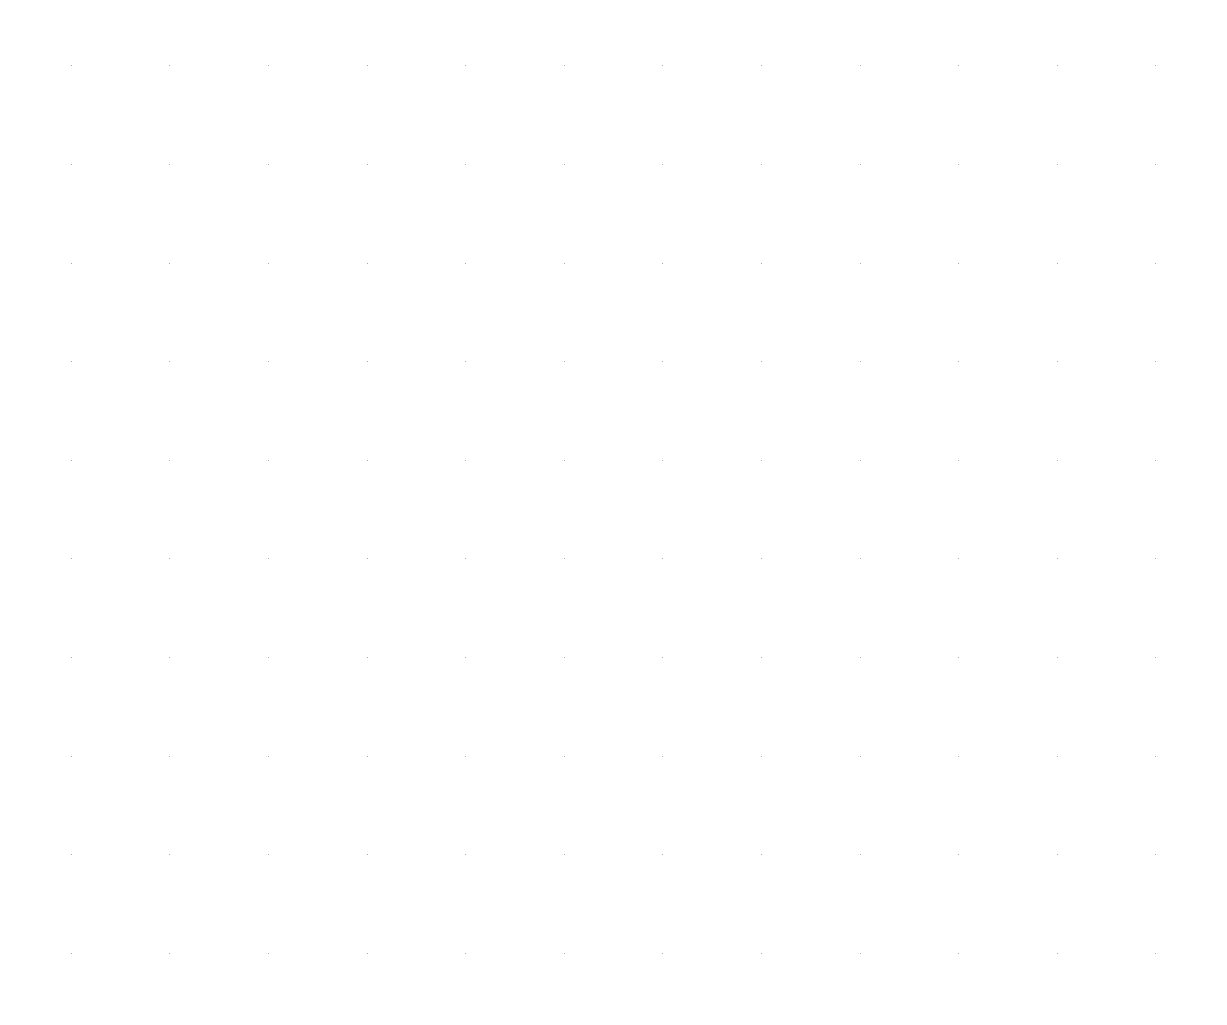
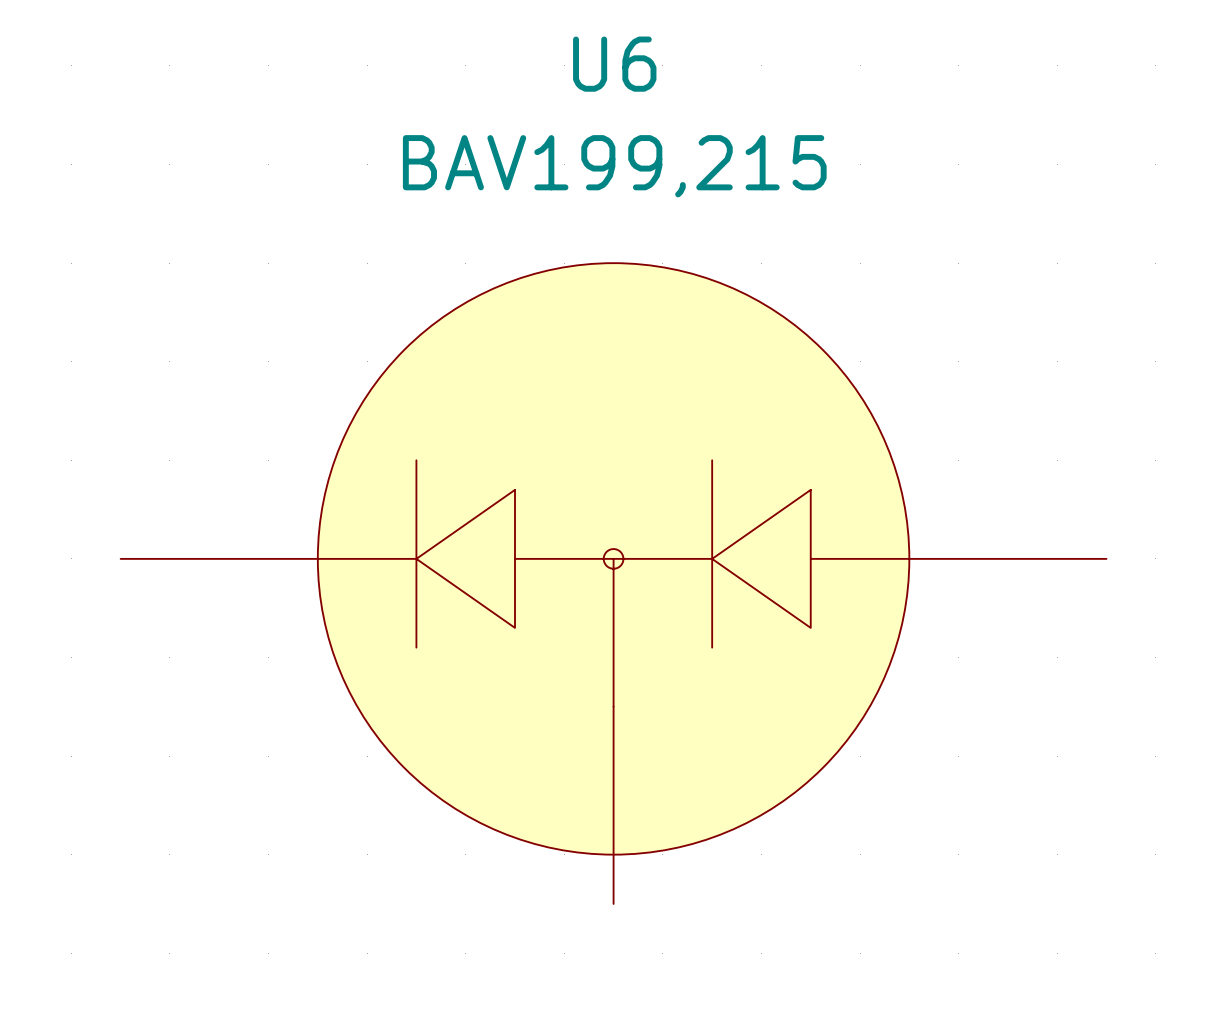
U6: none -> BAV199,215 (613, 583)

